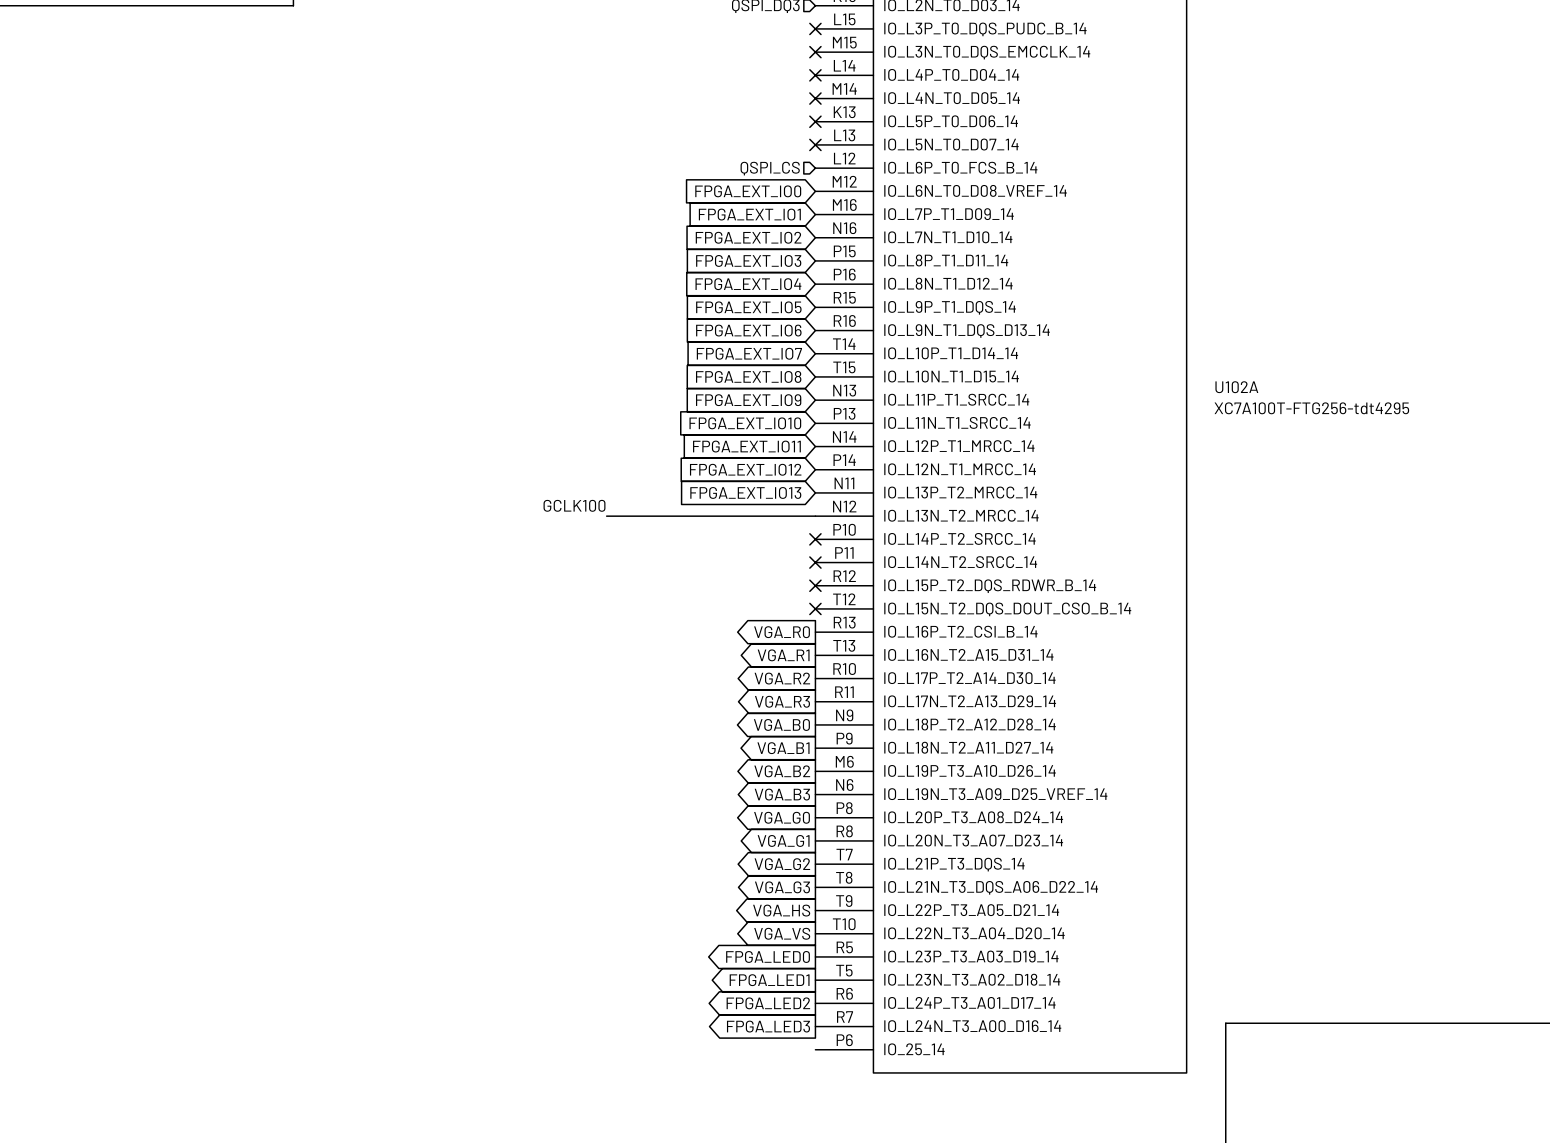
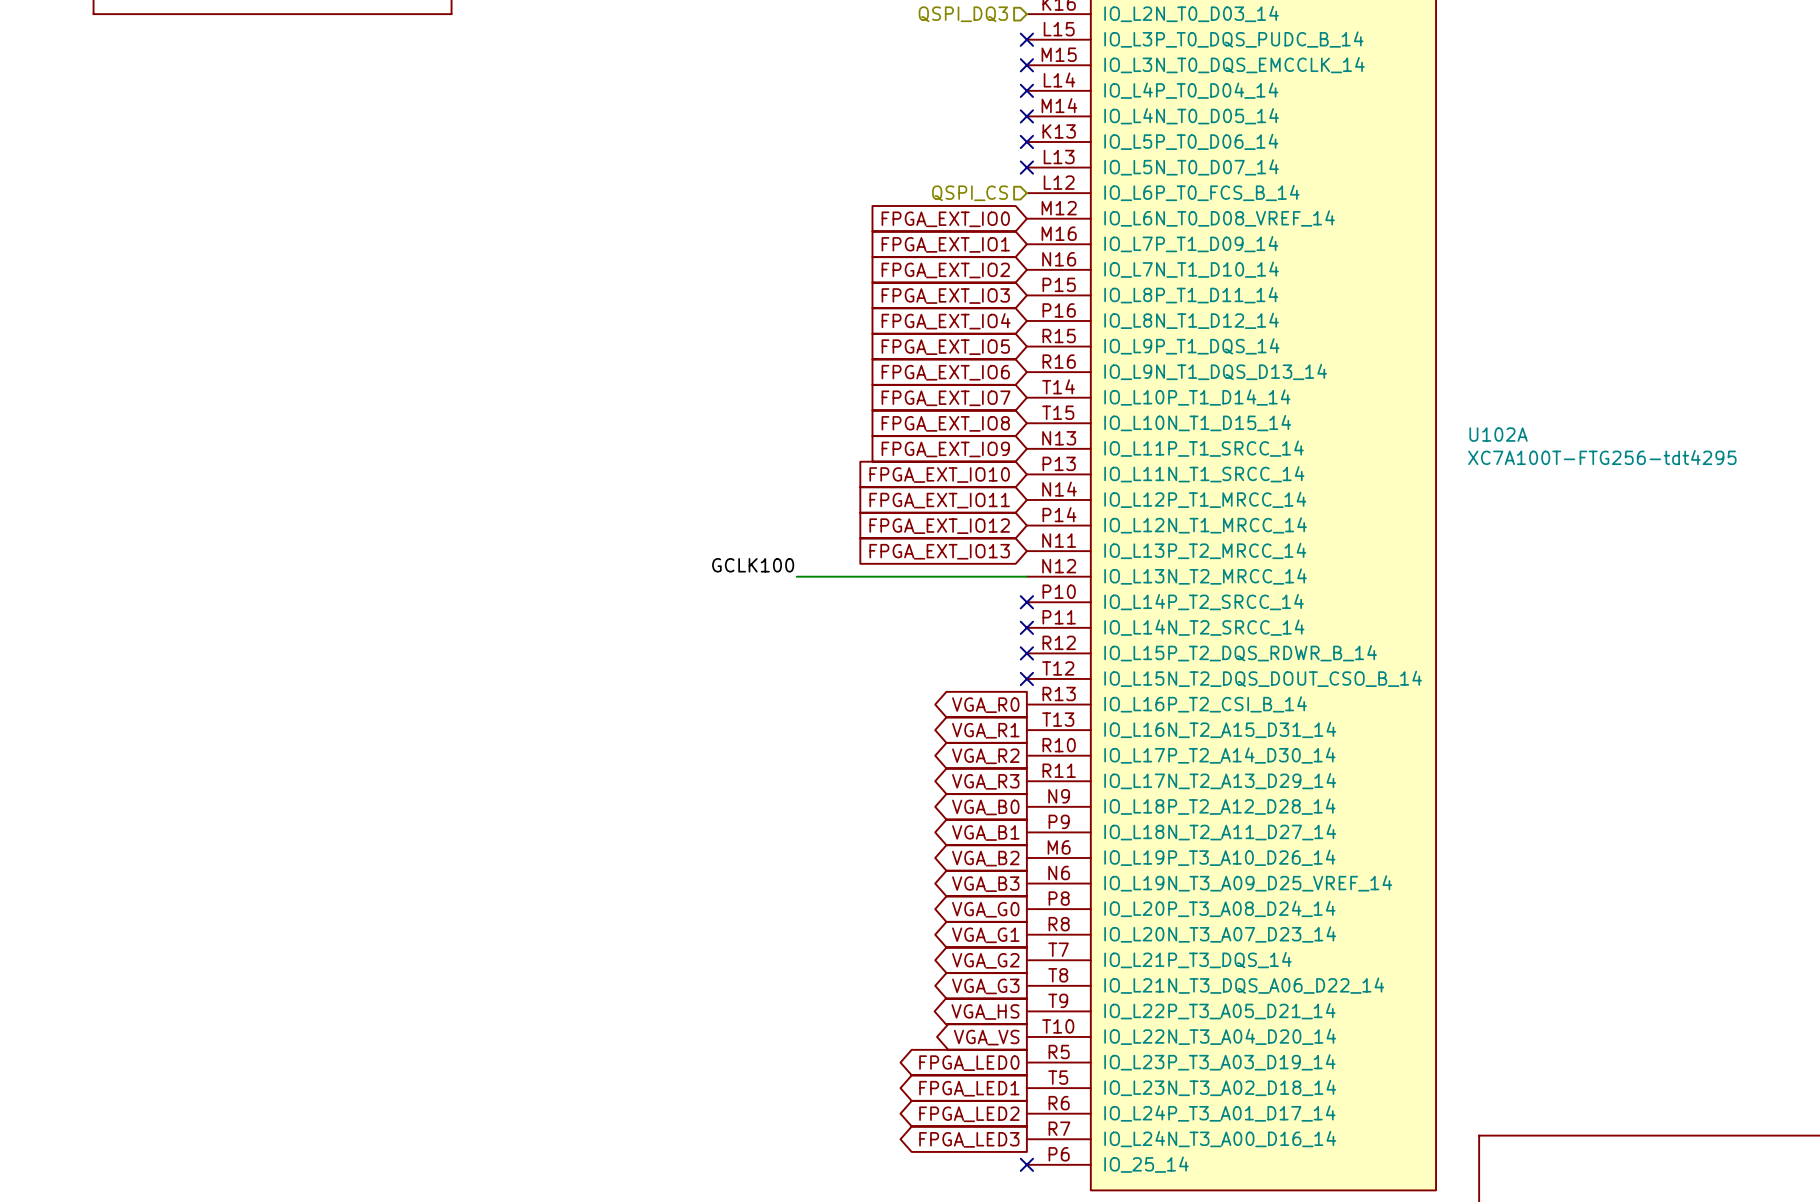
no-connect mark: none -> (1026, 1164)

